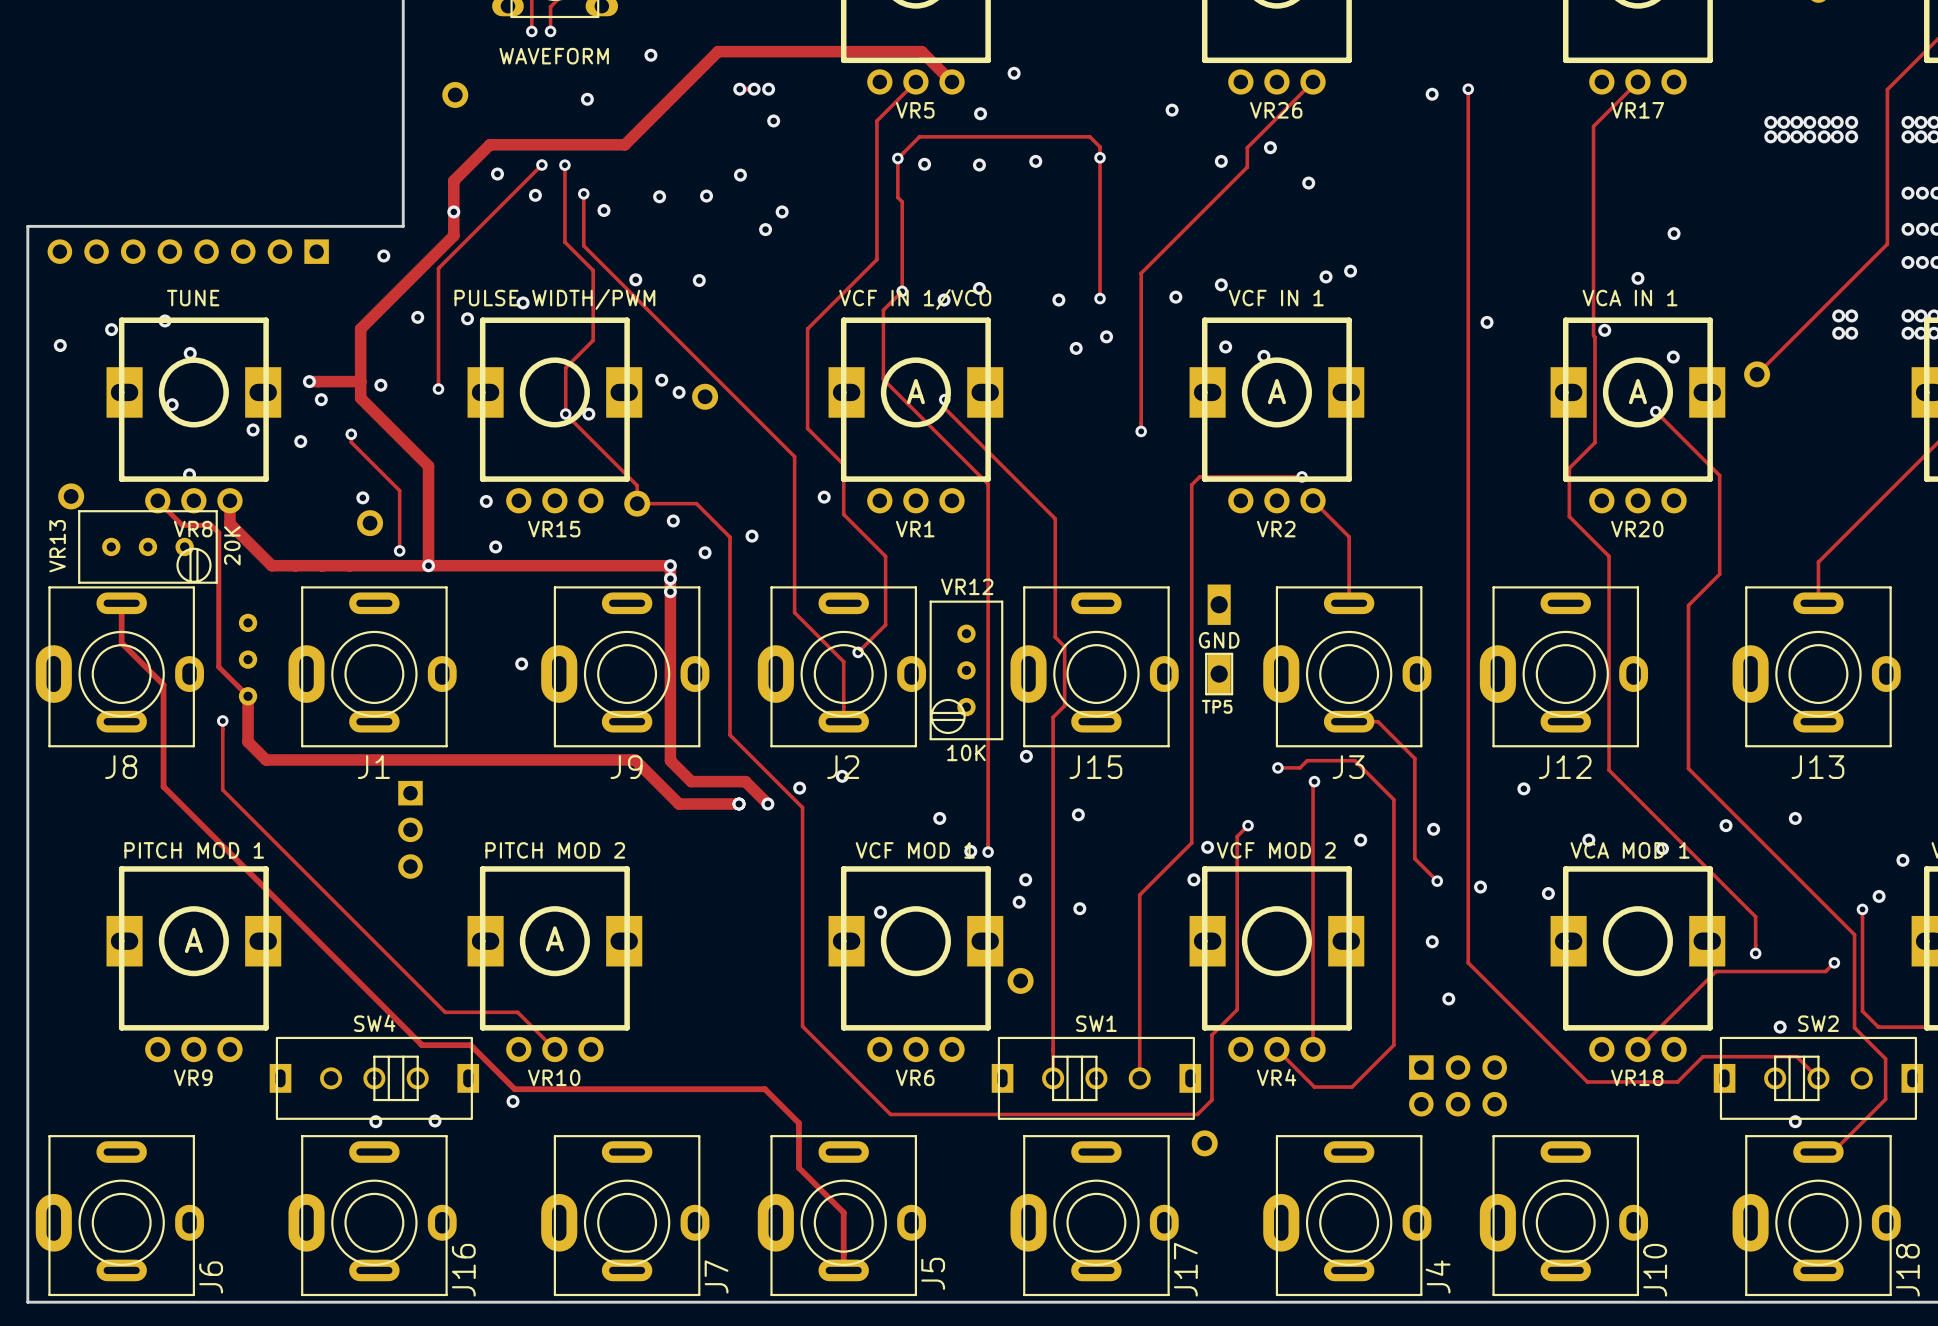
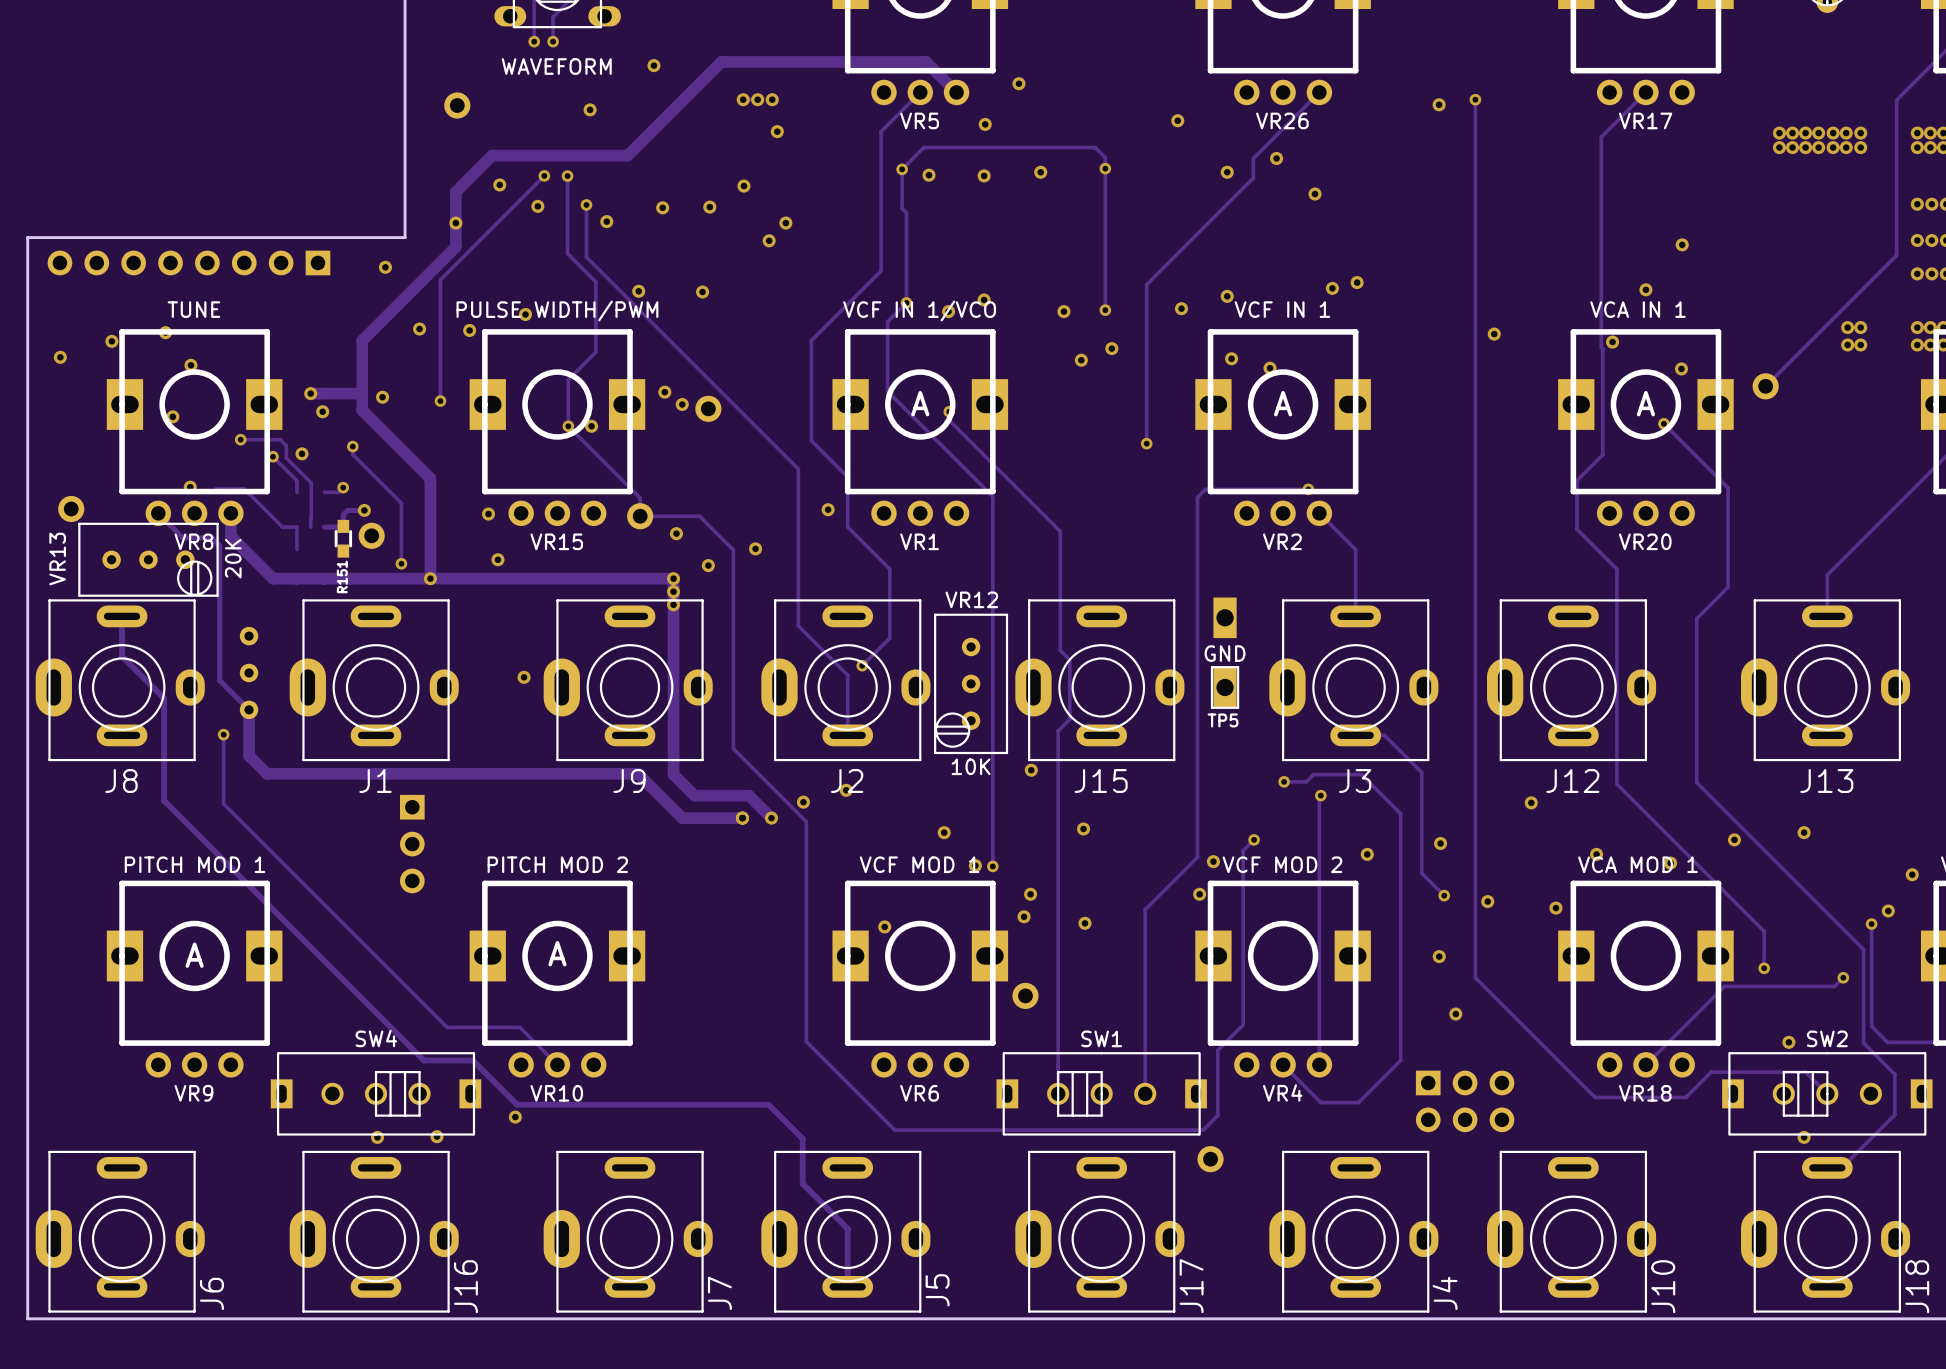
track: none -> (240, 439) (280, 439) (286, 445) (286, 458) (311, 483) (310, 527)
via: none -> (240, 439)
via: (253, 429) -> none
track: none -> (272, 456) (296, 480) (296, 492)
via: none -> (272, 456)
track: none -> (343, 487) (338, 492) (324, 492)
via: none -> (343, 487)
track: none -> (215, 488) (244, 488) (282, 527) (296, 527) (296, 549)
track: none -> (364, 510) (347, 510) (343, 514) (342, 527) (324, 527)
R151: none -> (343, 538)

